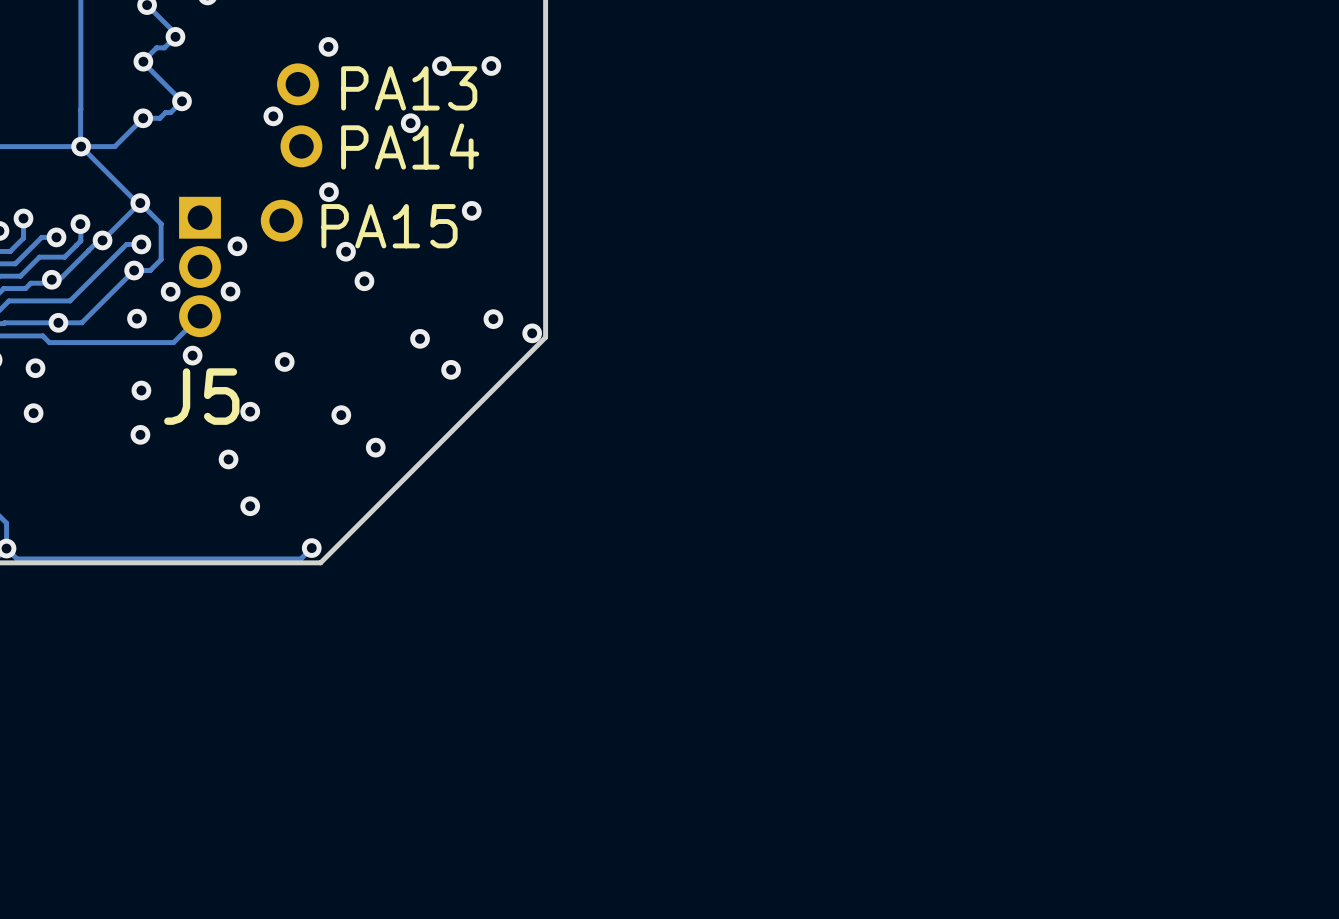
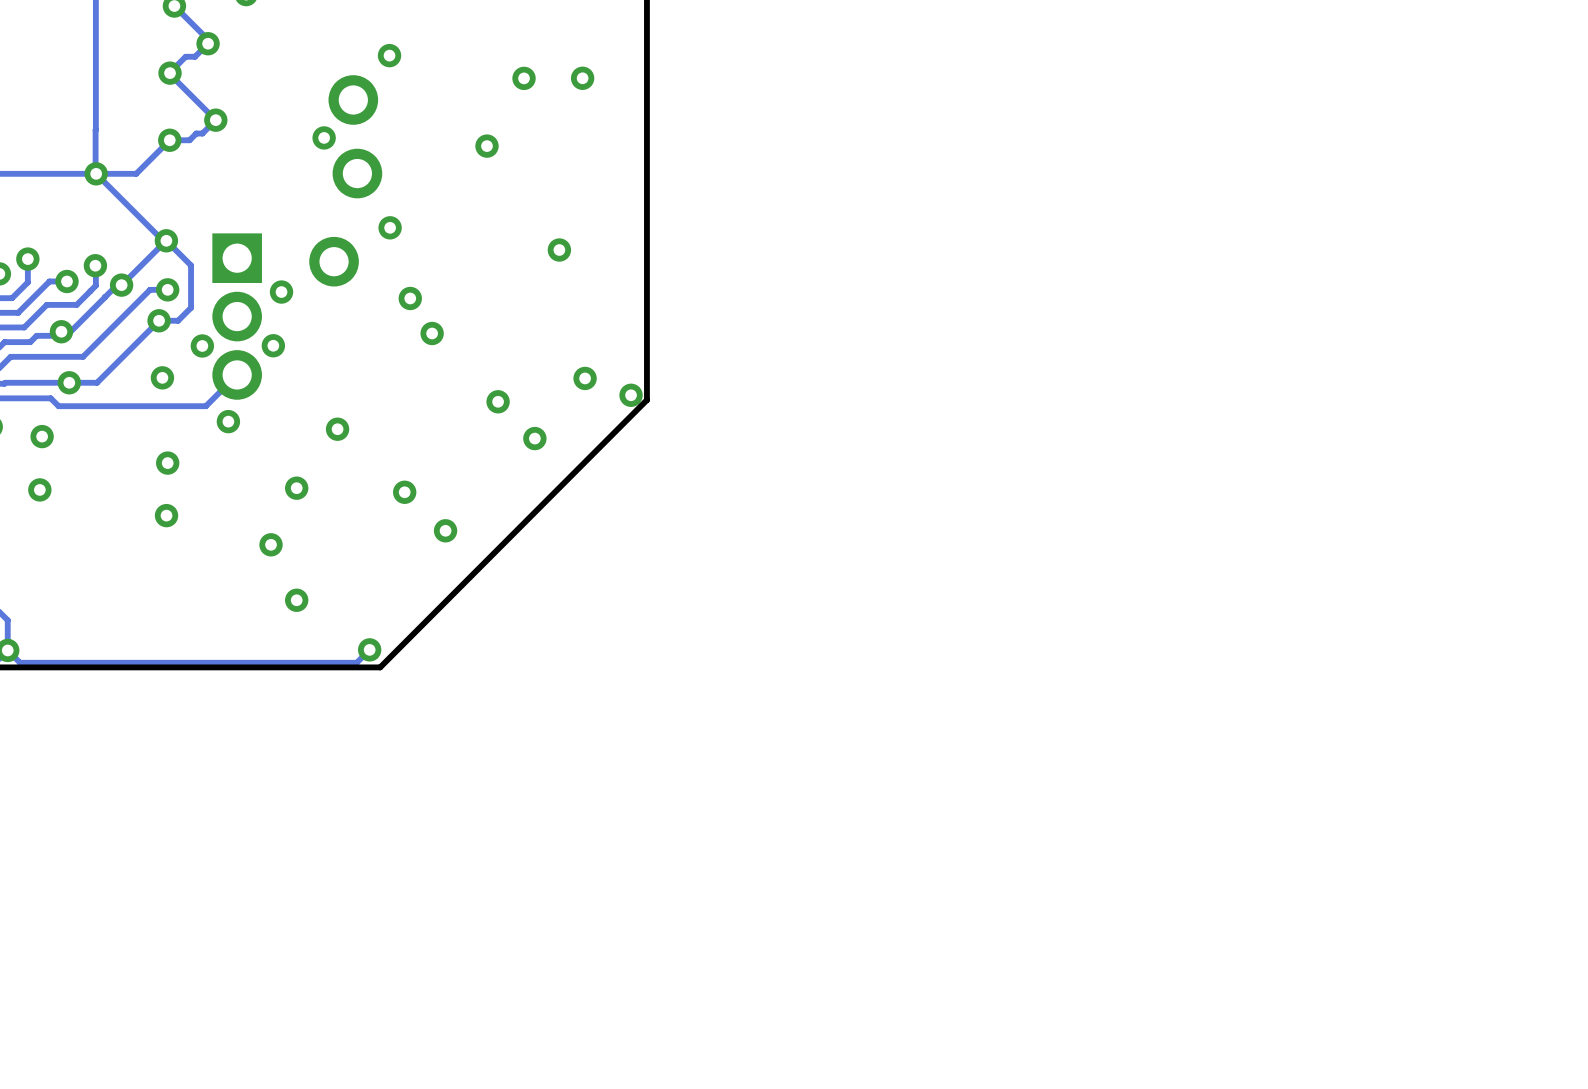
text: PA13 (409, 88) -> none
text: PA14 (410, 146) -> none
text: PA15 (389, 226) -> none
J5 name: J5 (201, 396) -> none

